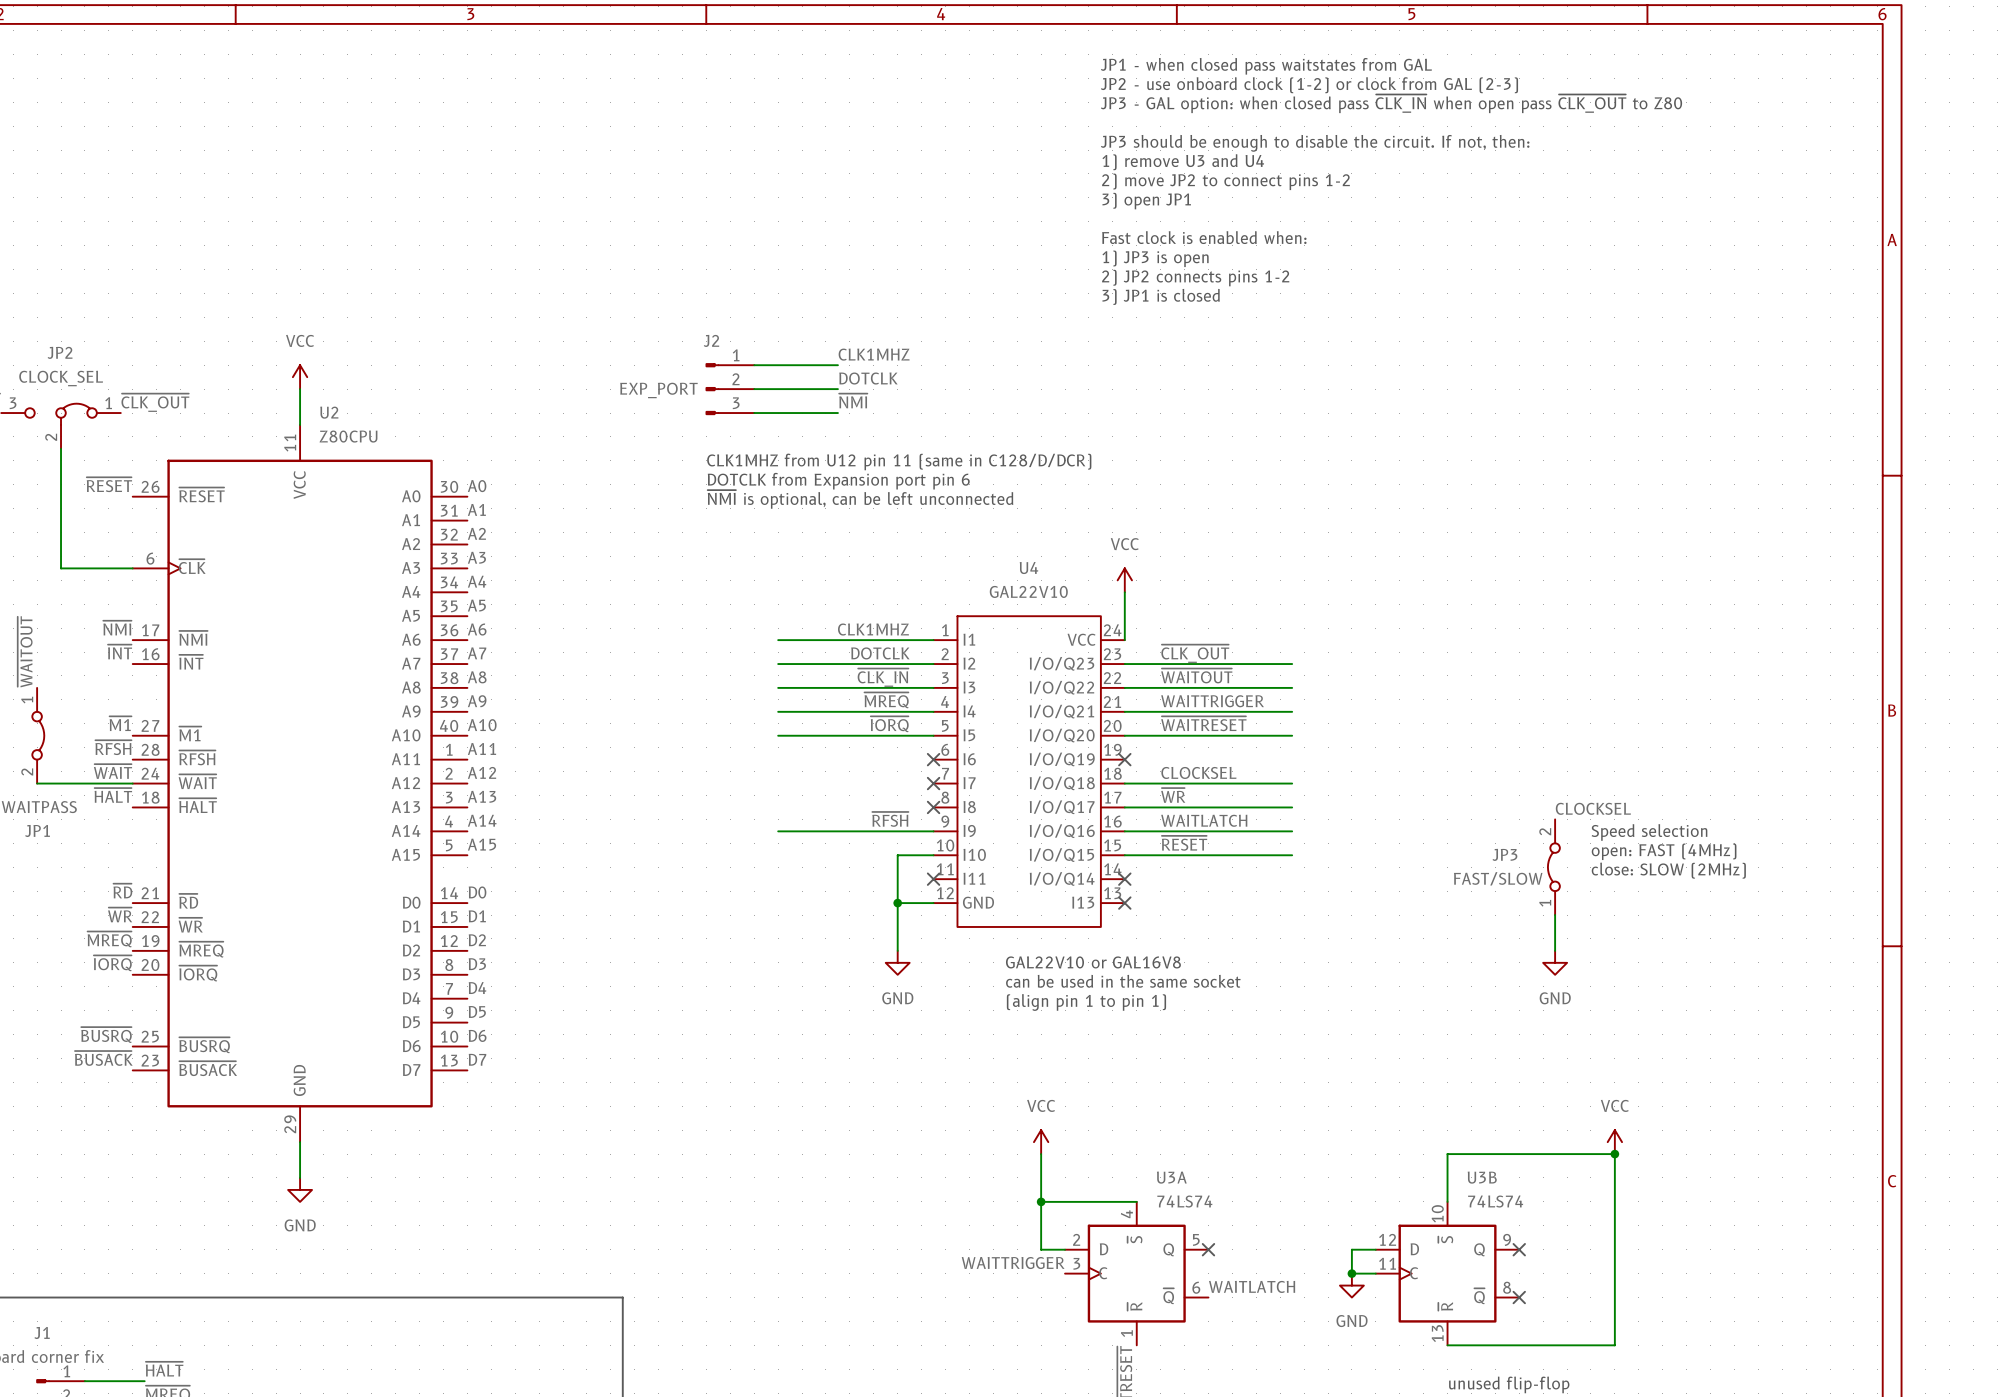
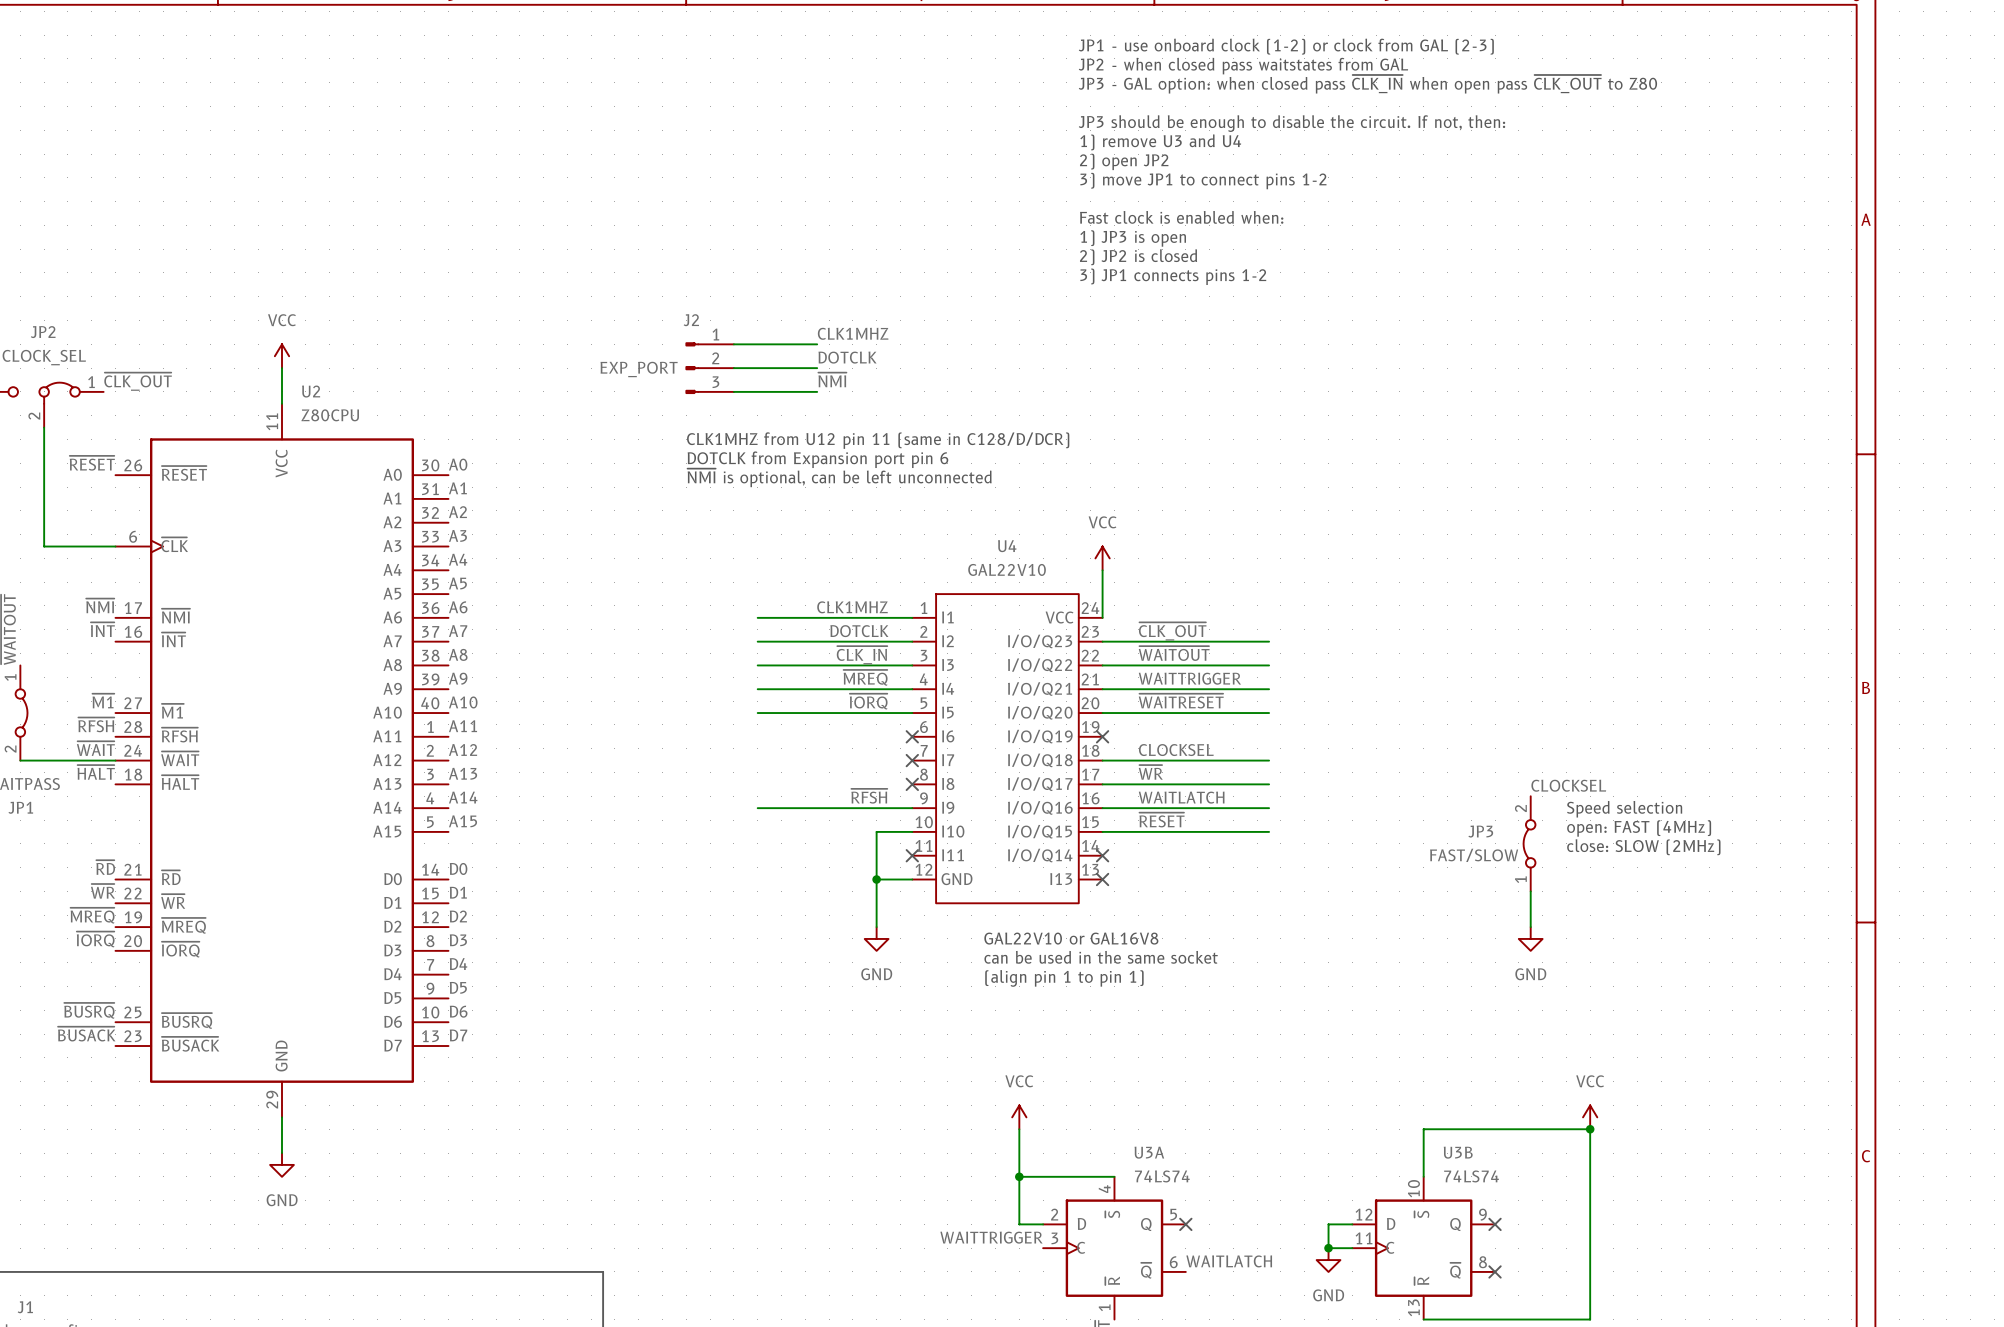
text: JP1 - when closed pass waitstates from GAL (1266, 66) -> JP1 - use onboard clock (1-2) or clock from GAL (2-3) (1286, 46)
text: JP2 - use onboard clock (1-2) or clock from GAL (2-3) (1309, 85) -> JP2 - when closed pass waitstates from GAL (1243, 66)
text: 2) move JP2 to connect pins 1-2 (1225, 181) -> 2) open JP2 (1124, 161)
text: 3) open JP1 (1146, 201) -> 3) move JP1 to connect pins 1-2 (1203, 181)
text: 2) JP2 connects pins 1-2 (1195, 278) -> 2) JP2 is closed (1138, 257)
text: 3) JP1 is closed (1161, 296) -> 3) JP1 connects pins 1-2 (1173, 276)

